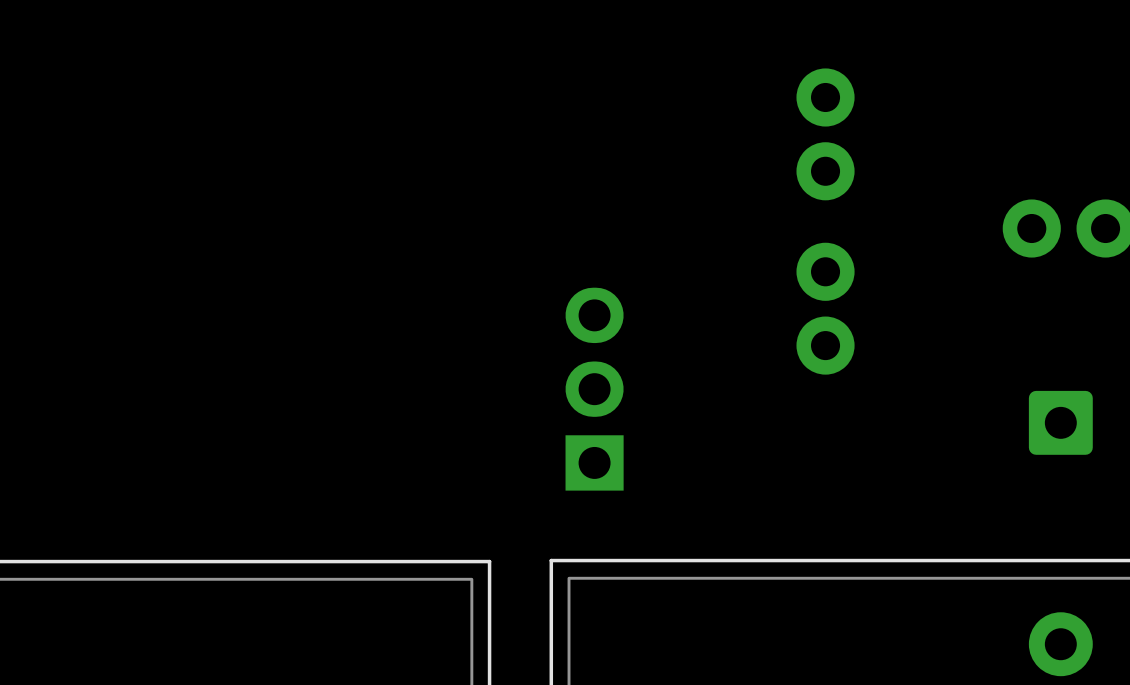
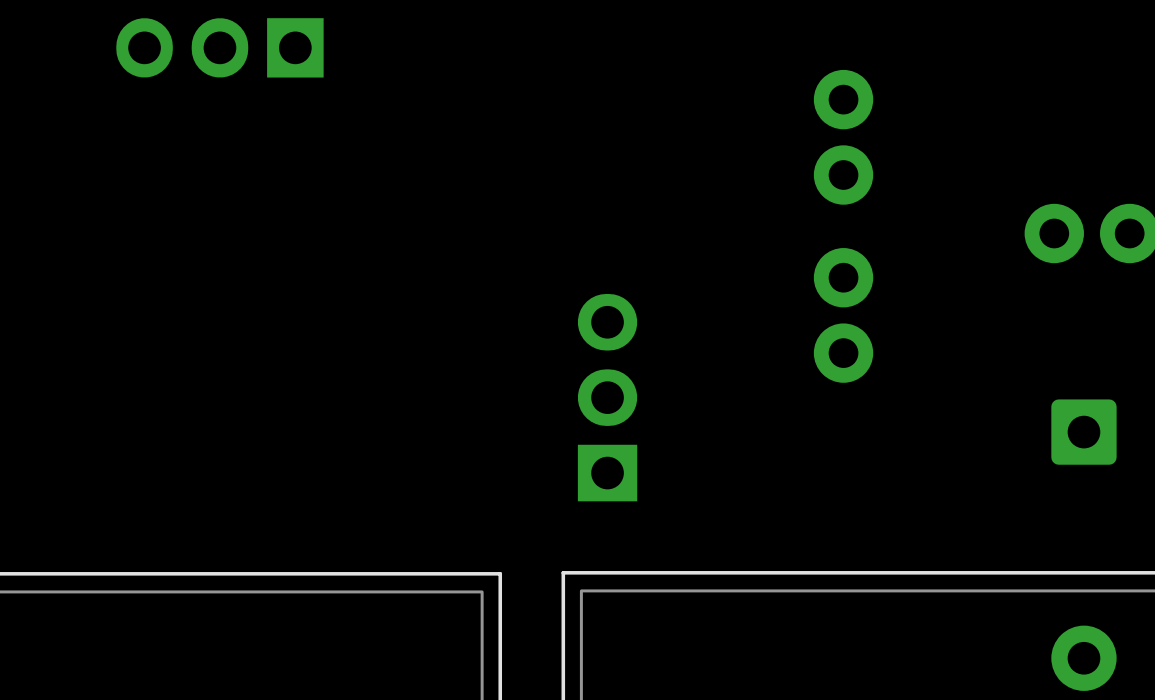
part: none -> (219, 47)

